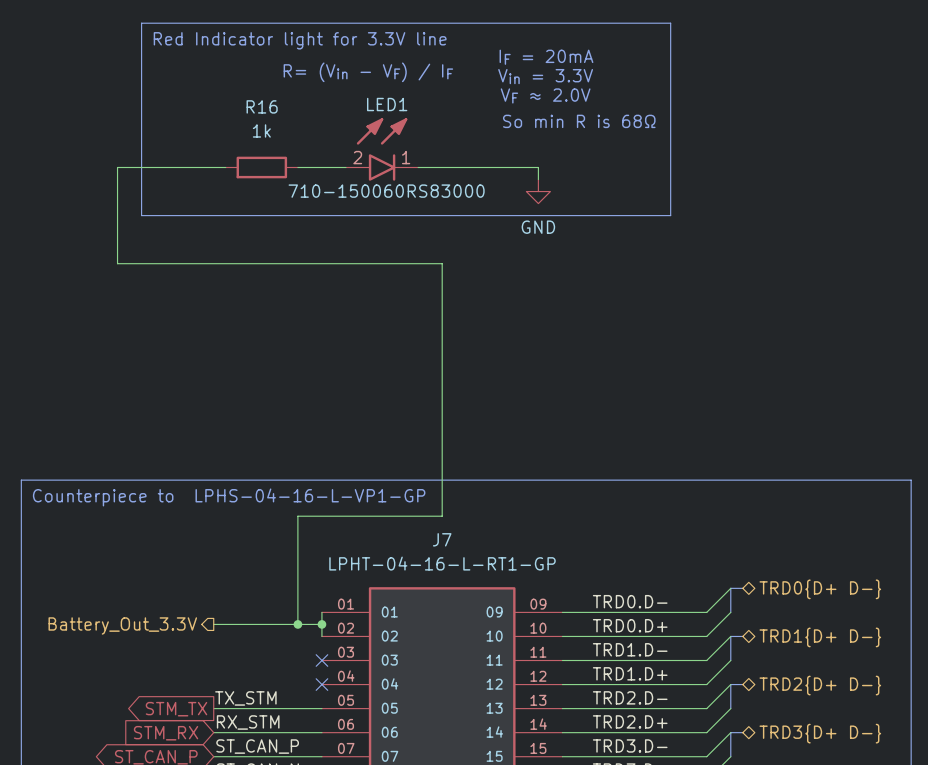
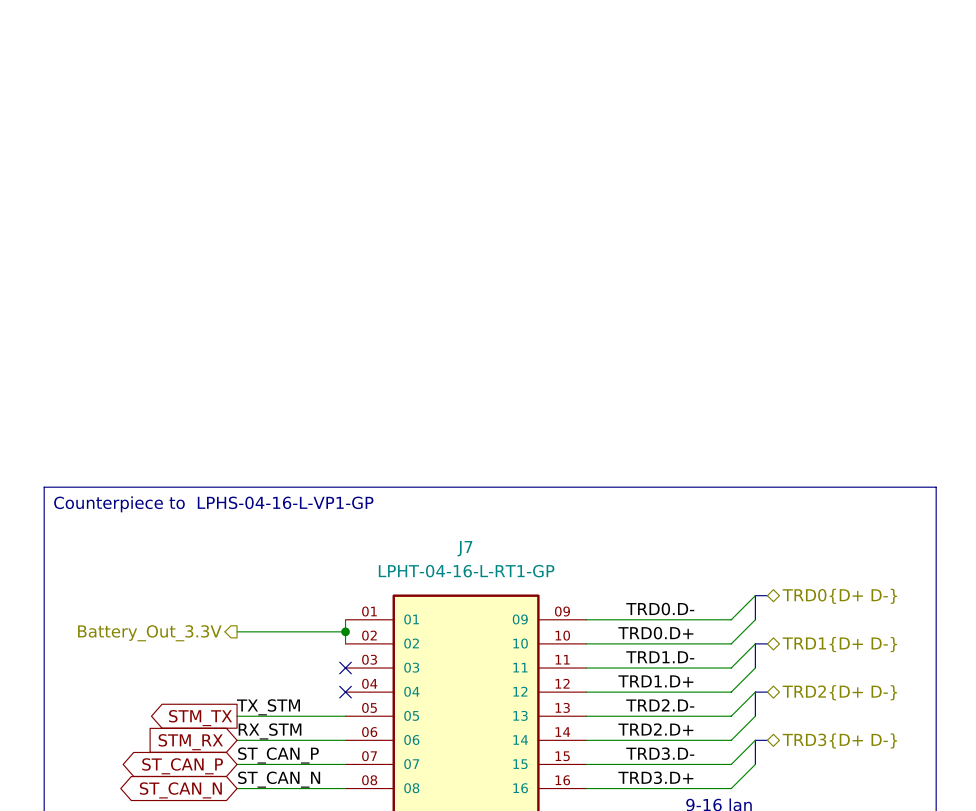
line: (141, 23) (670, 23) (670, 215) (141, 215) (141, 23) -> none
text: Red Indicator light for 3.3V line (300, 40) -> none
text: IF = 20mA (546, 57) -> none
text: R= (Vin - VF) / IF (368, 72) -> none
text: Vin = 3.3V (545, 76) -> none
text: VF ≈ 2.0V (545, 95) -> none
text: So min R is 68Ω (579, 121) -> none
LED1: 710-150060RS83000 (382, 149) -> none
wire: (225, 167) (117, 167) (117, 263) (442, 263) (442, 516) (297, 516) (297, 624) -> none
R16: 1k (261, 167) -> none
wire: (297, 167) (346, 167) -> none
wire: (418, 167) (538, 167) (538, 179) -> none
power symbol: GND (538, 191) -> none
junction: (297, 624) -> none

